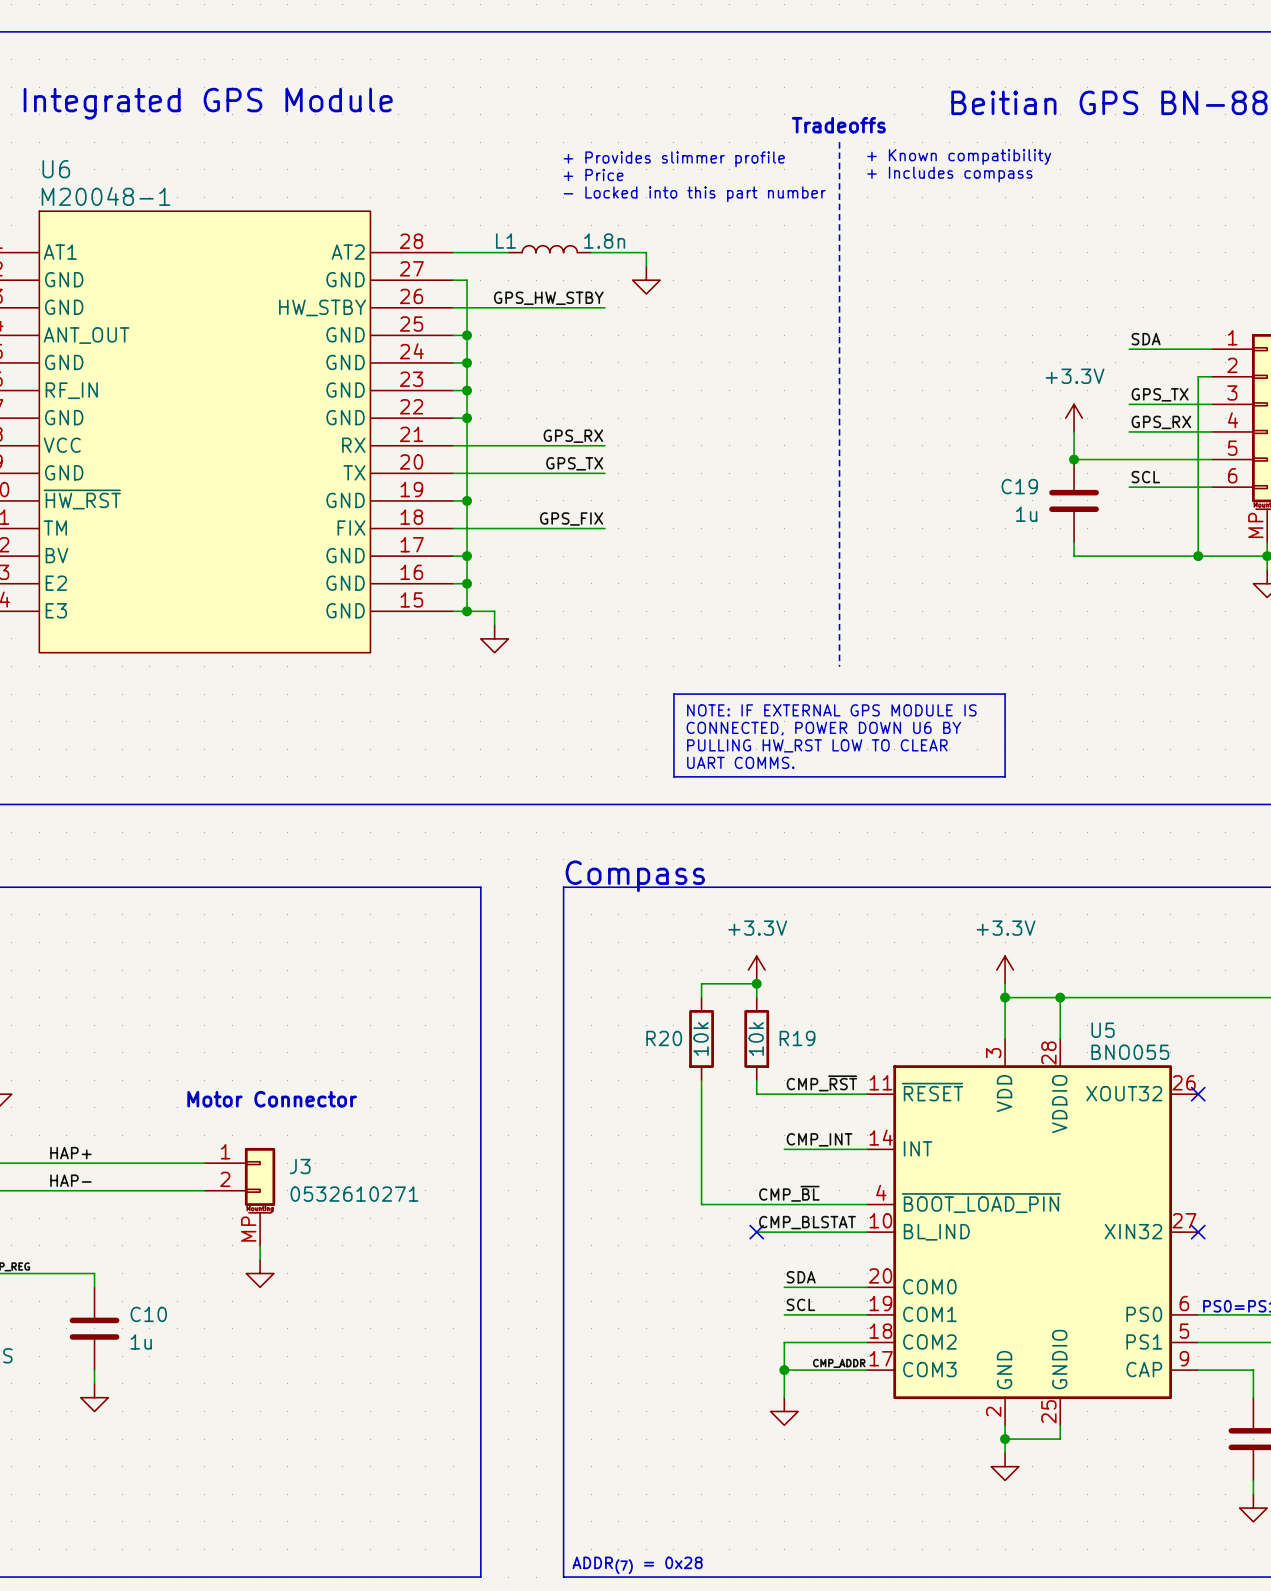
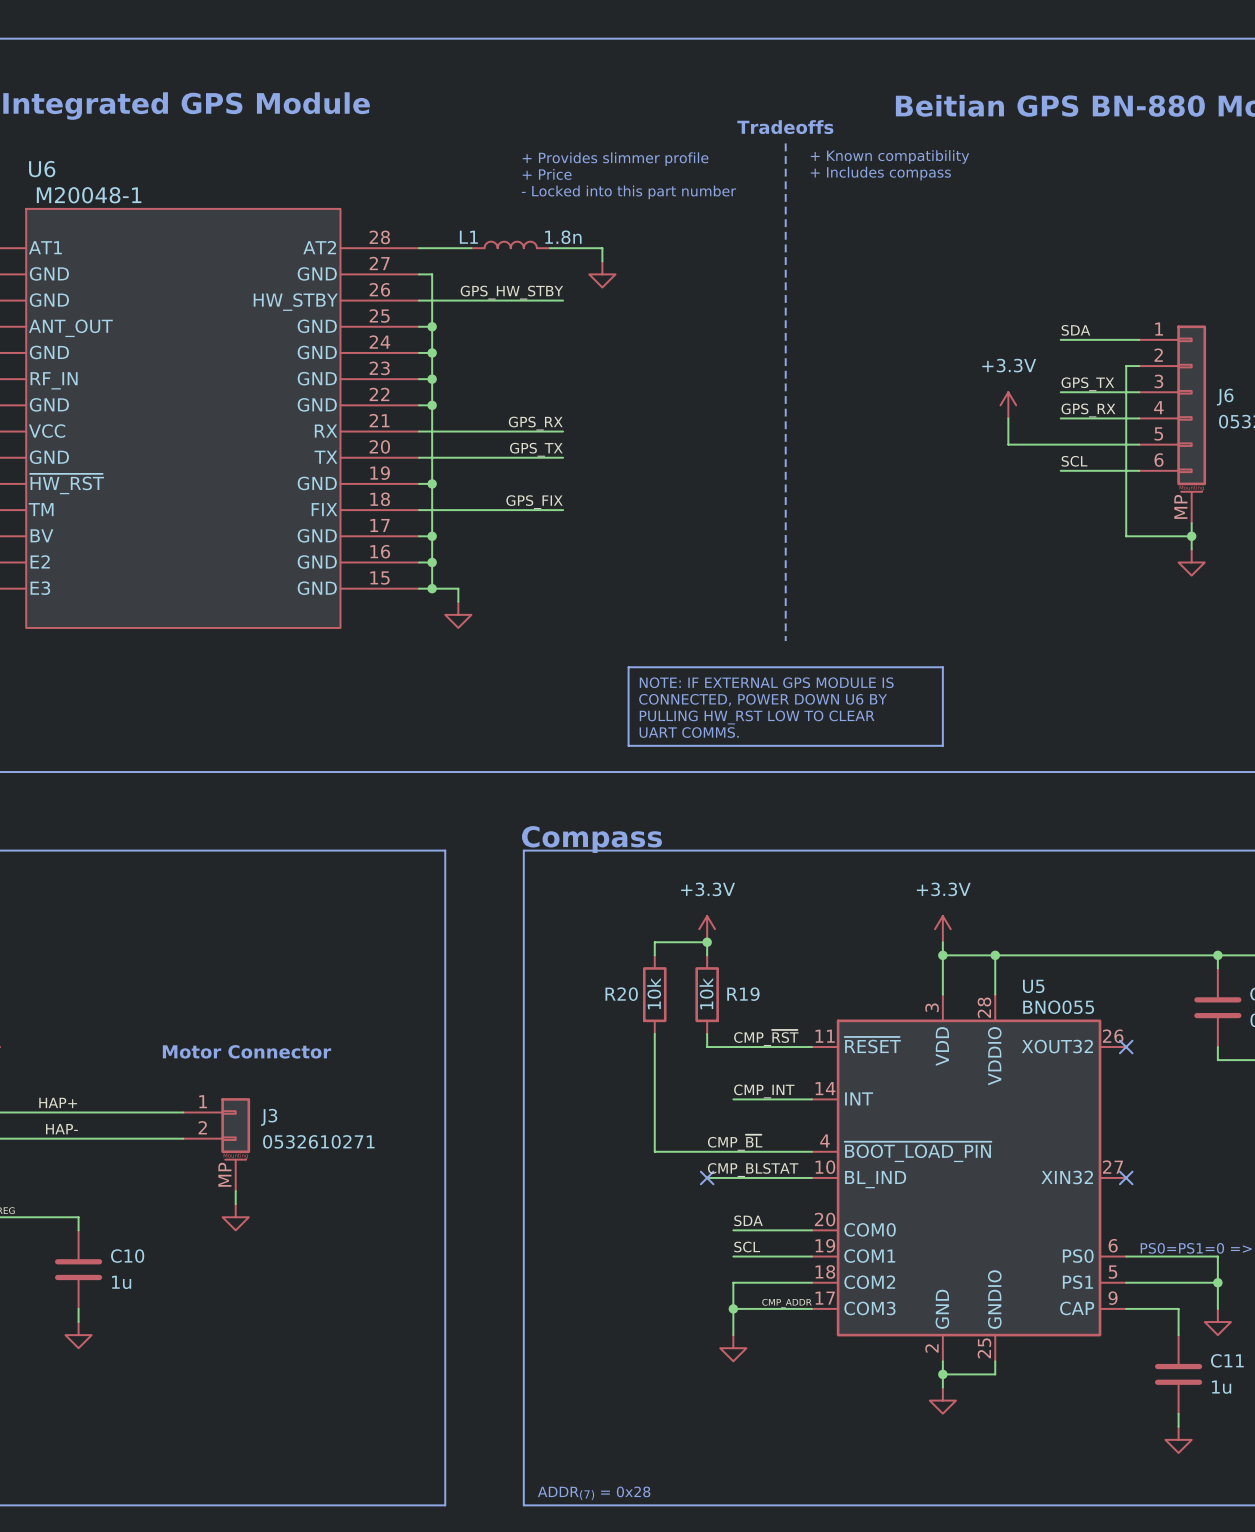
junction: (1074, 459) -> none
C19: 1u (1074, 500) -> none
wire: (1074, 542) (1074, 556) (1198, 556) -> none
junction: (1198, 556) -> none

